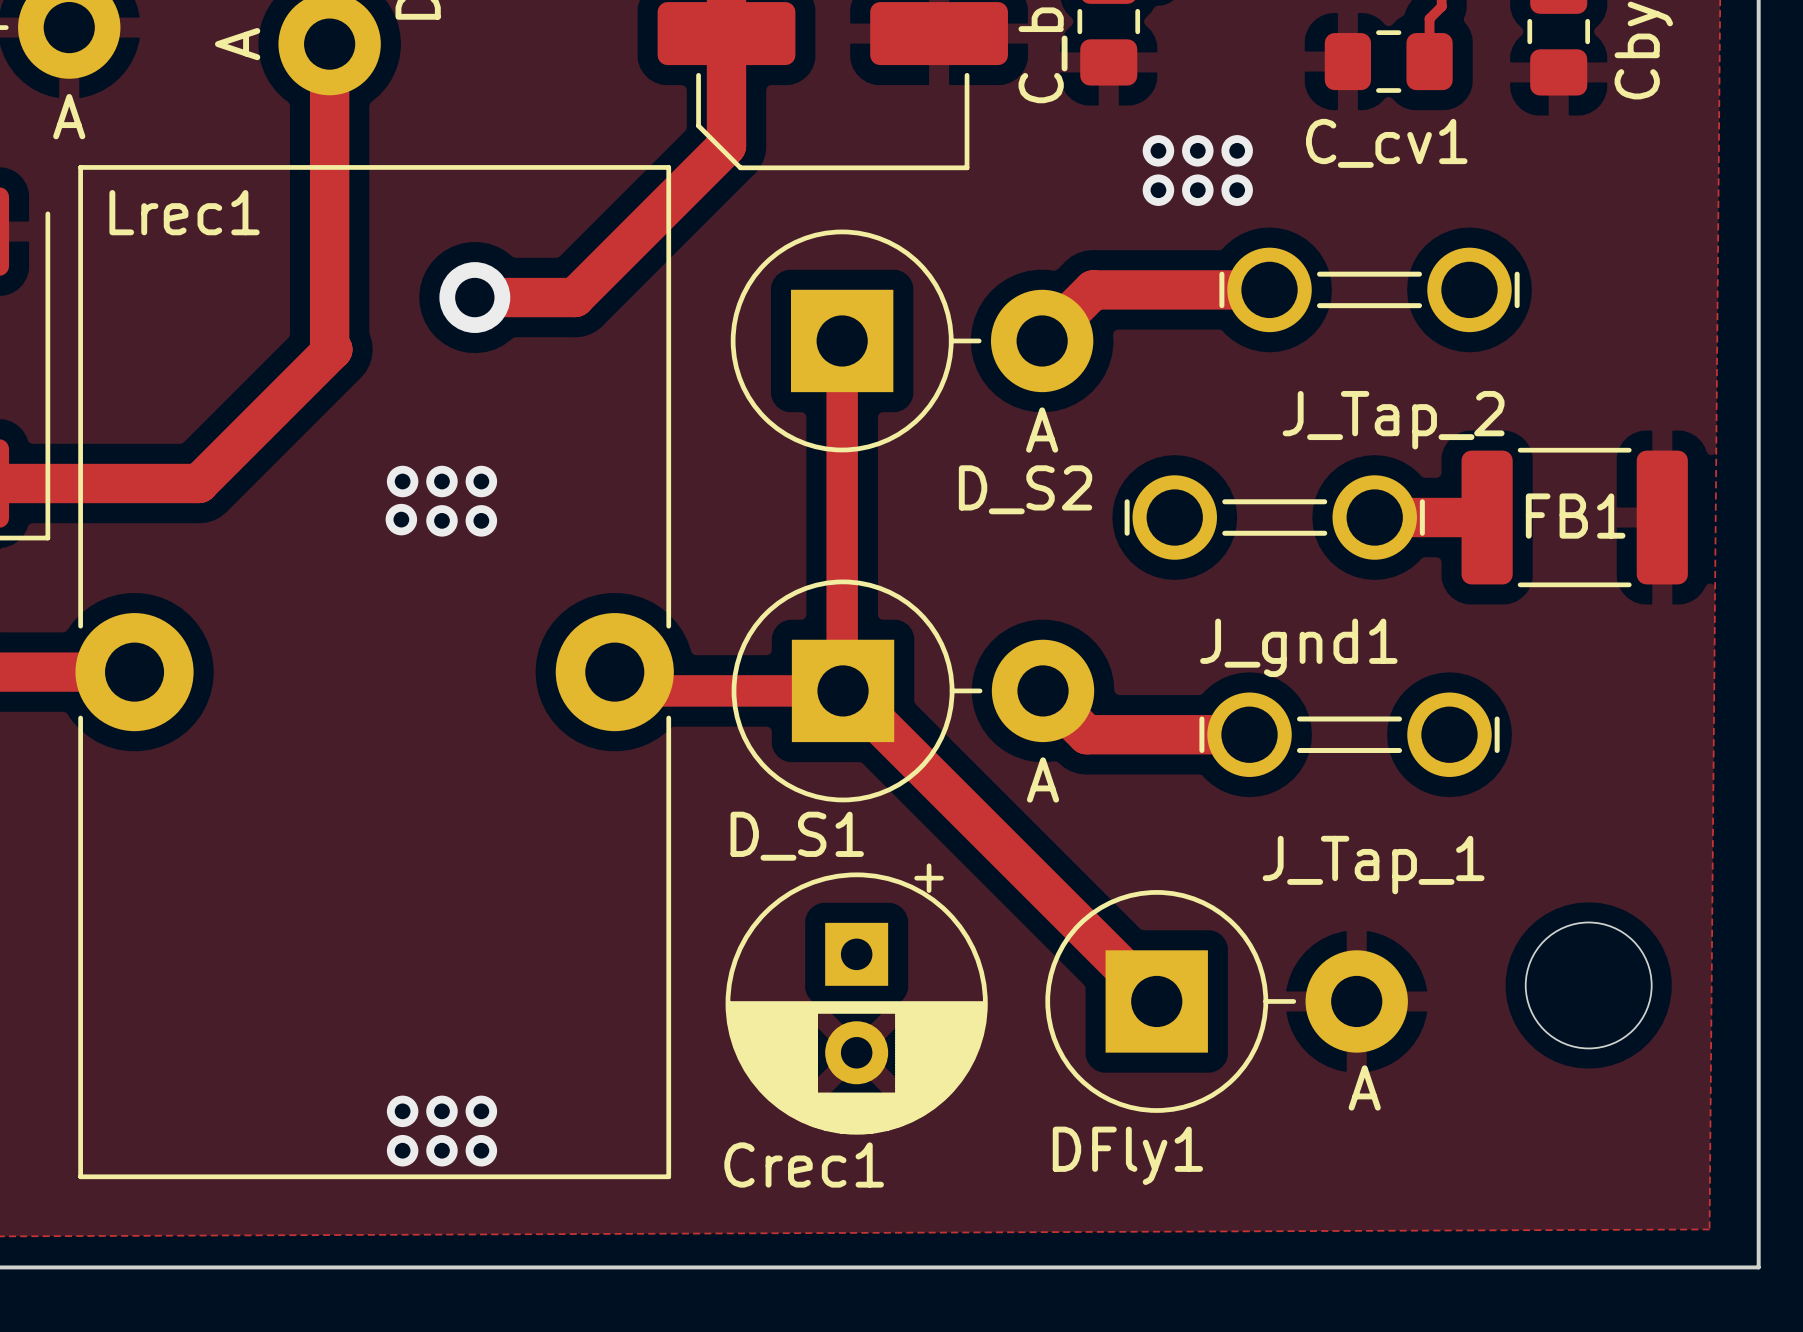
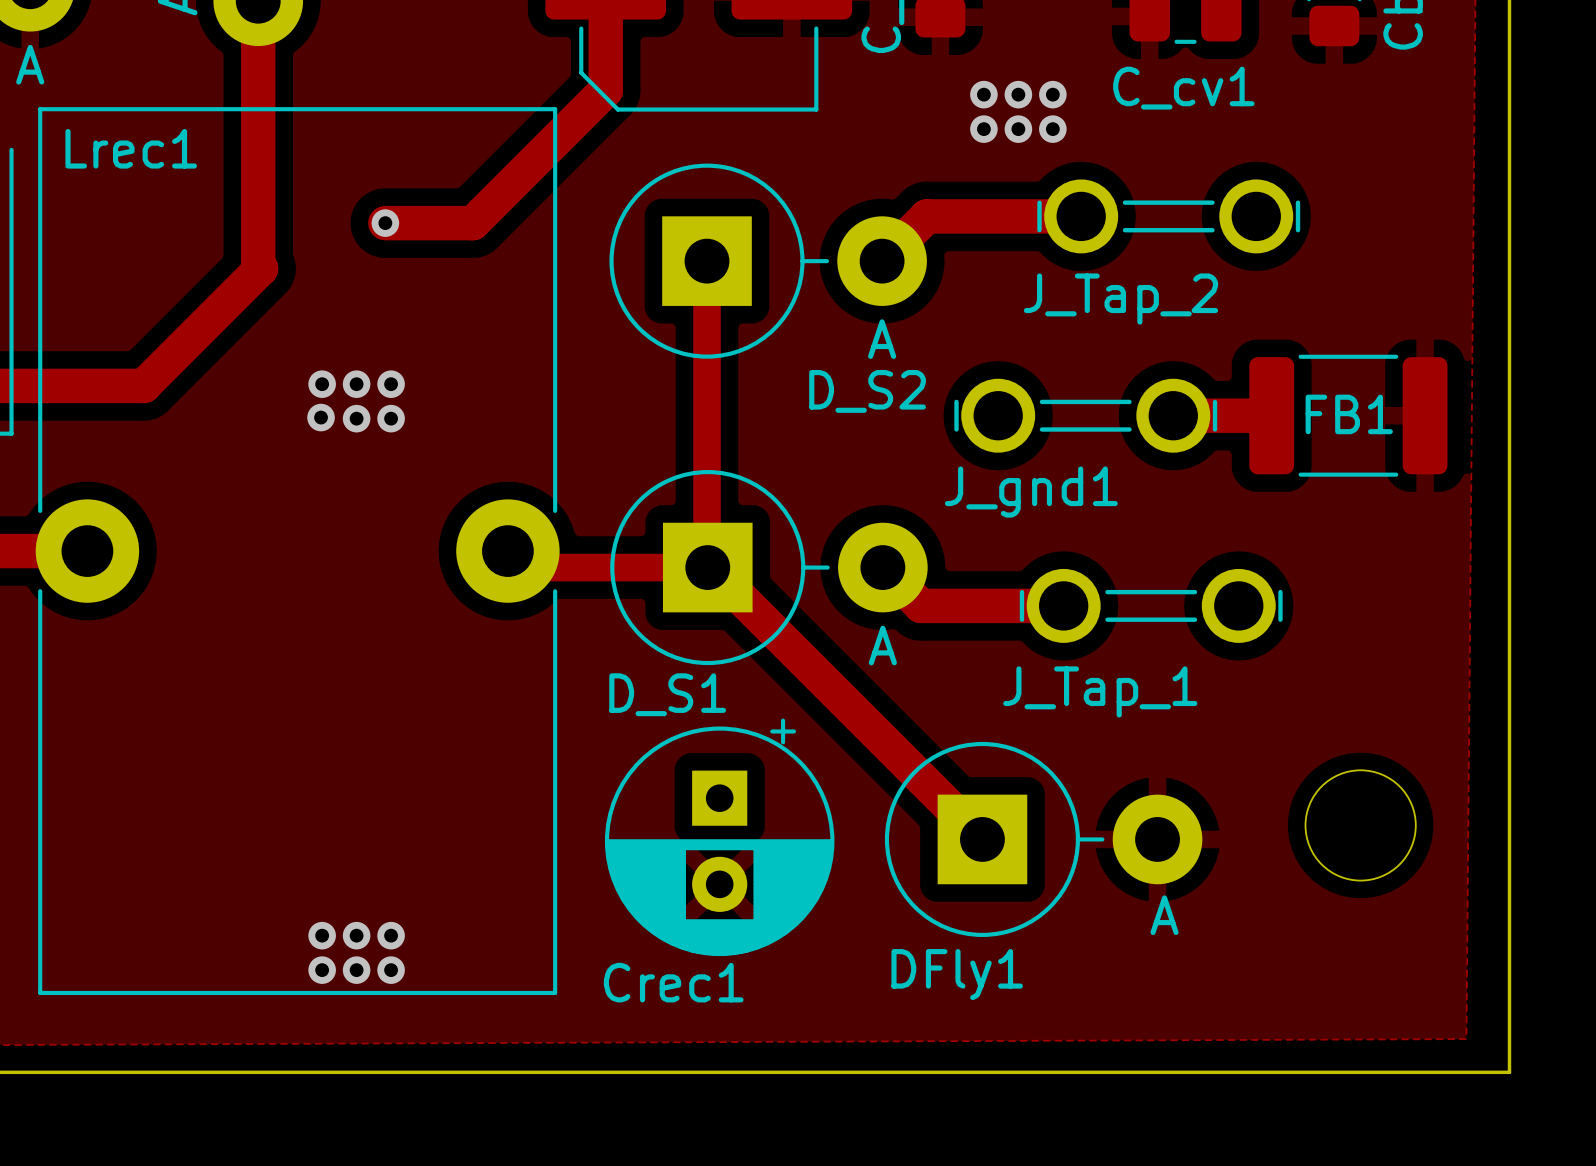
via size: [439, 262, 511, 333] -> [371, 209, 400, 237]
J_Tap_2 name position: J_Tap_2 (1393, 420) -> J_Tap_2 (1120, 299)
J_gnd1 name position: J_gnd1 (1298, 647) -> J_gnd1 (1031, 492)
J_Tap_1 name position: J_Tap_1 (1373, 865) -> J_Tap_1 (1100, 691)

